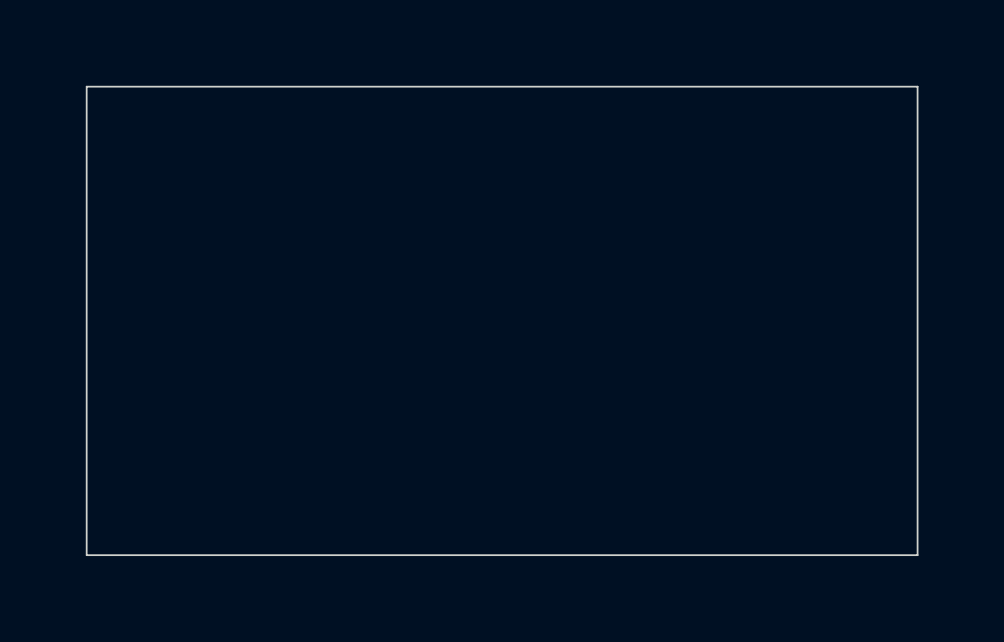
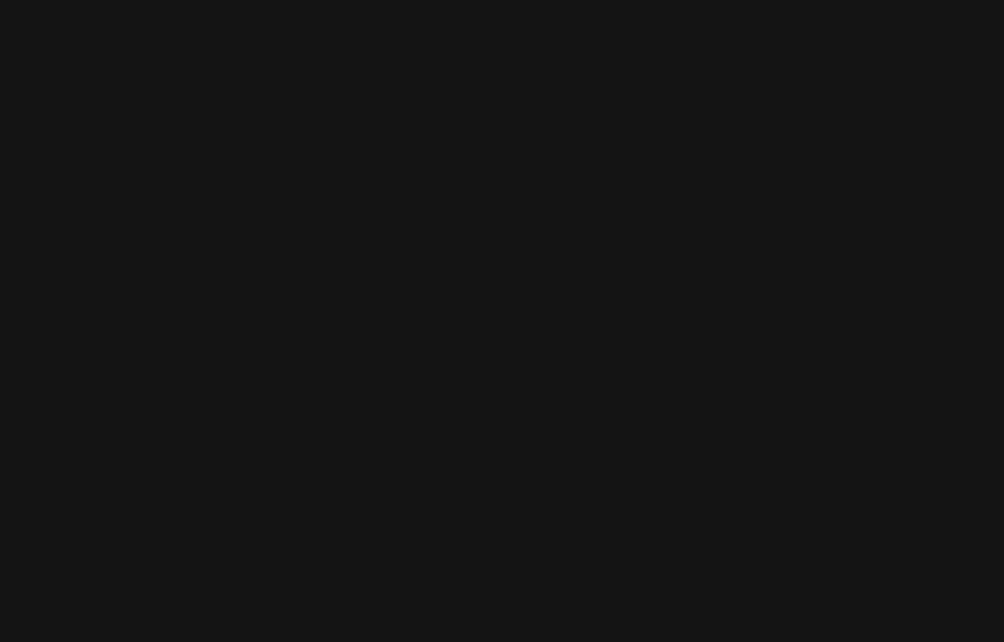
board edge: (917, 86) (86, 86) (86, 555) (917, 555) (917, 86) -> none

